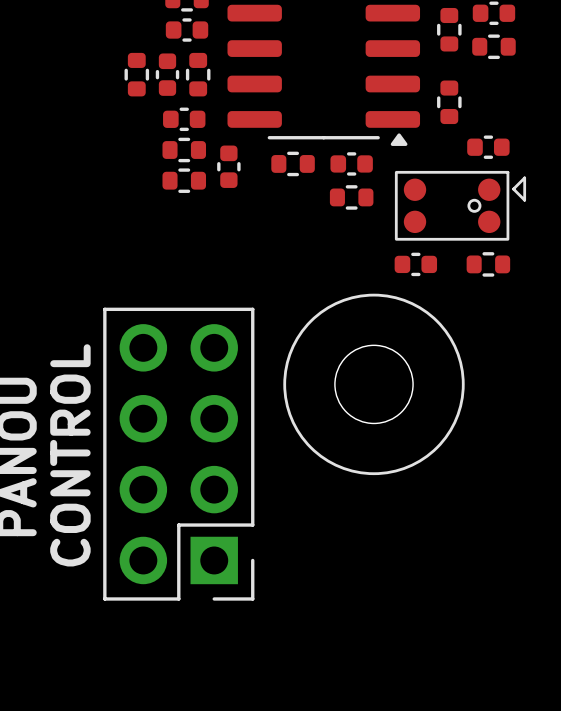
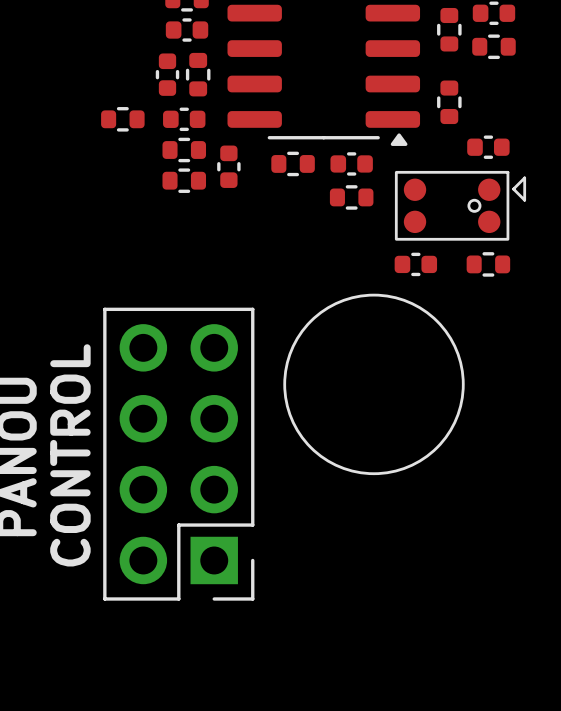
part rotation: 0° (136, 74) -> 90° clockwise (122, 119)
part position: (136, 74) -> (122, 119)
round board edge: [334, 344, 414, 425] -> none

